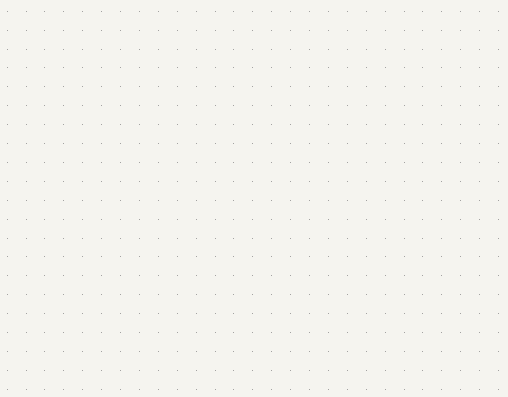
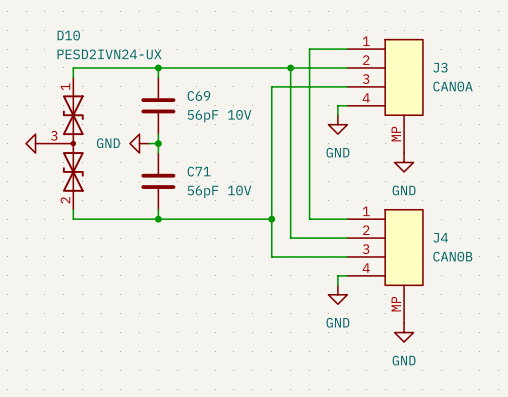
wire: none -> (347, 49) (309, 49) (309, 219) (347, 219)
wire: none -> (158, 67) (158, 77)
junction: none -> (158, 67)
wire: none -> (290, 67) (290, 238) (347, 238)
junction: none -> (290, 67)
wire: none -> (347, 67) (73, 67) (73, 77)
wire: none -> (347, 86) (271, 86) (271, 256) (347, 256)
J3: none -> CAN0A (385, 96)
C69: none -> 56pF 10V (158, 105)
wire: none -> (347, 105) (337, 105) (337, 115)
power symbol: none -> GND (337, 124)
wire: none -> (158, 134) (158, 153)
power symbol: none -> (35, 143)
D10: none -> PESD2IVN24-UX (64, 143)
power symbol: none -> GND (139, 143)
wire: none -> (148, 143) (158, 143)
junction: none -> (158, 143)
power symbol: none -> GND (404, 162)
C71: none -> 56pF 10V (158, 181)
wire: none -> (73, 209) (73, 219) (271, 219)
wire: none -> (158, 209) (158, 219)
junction: none -> (158, 219)
junction: none -> (271, 219)
J4: none -> CAN0B (385, 266)
wire: none -> (347, 275) (337, 275) (337, 285)
power symbol: none -> GND (337, 294)
power symbol: none -> GND (404, 332)

